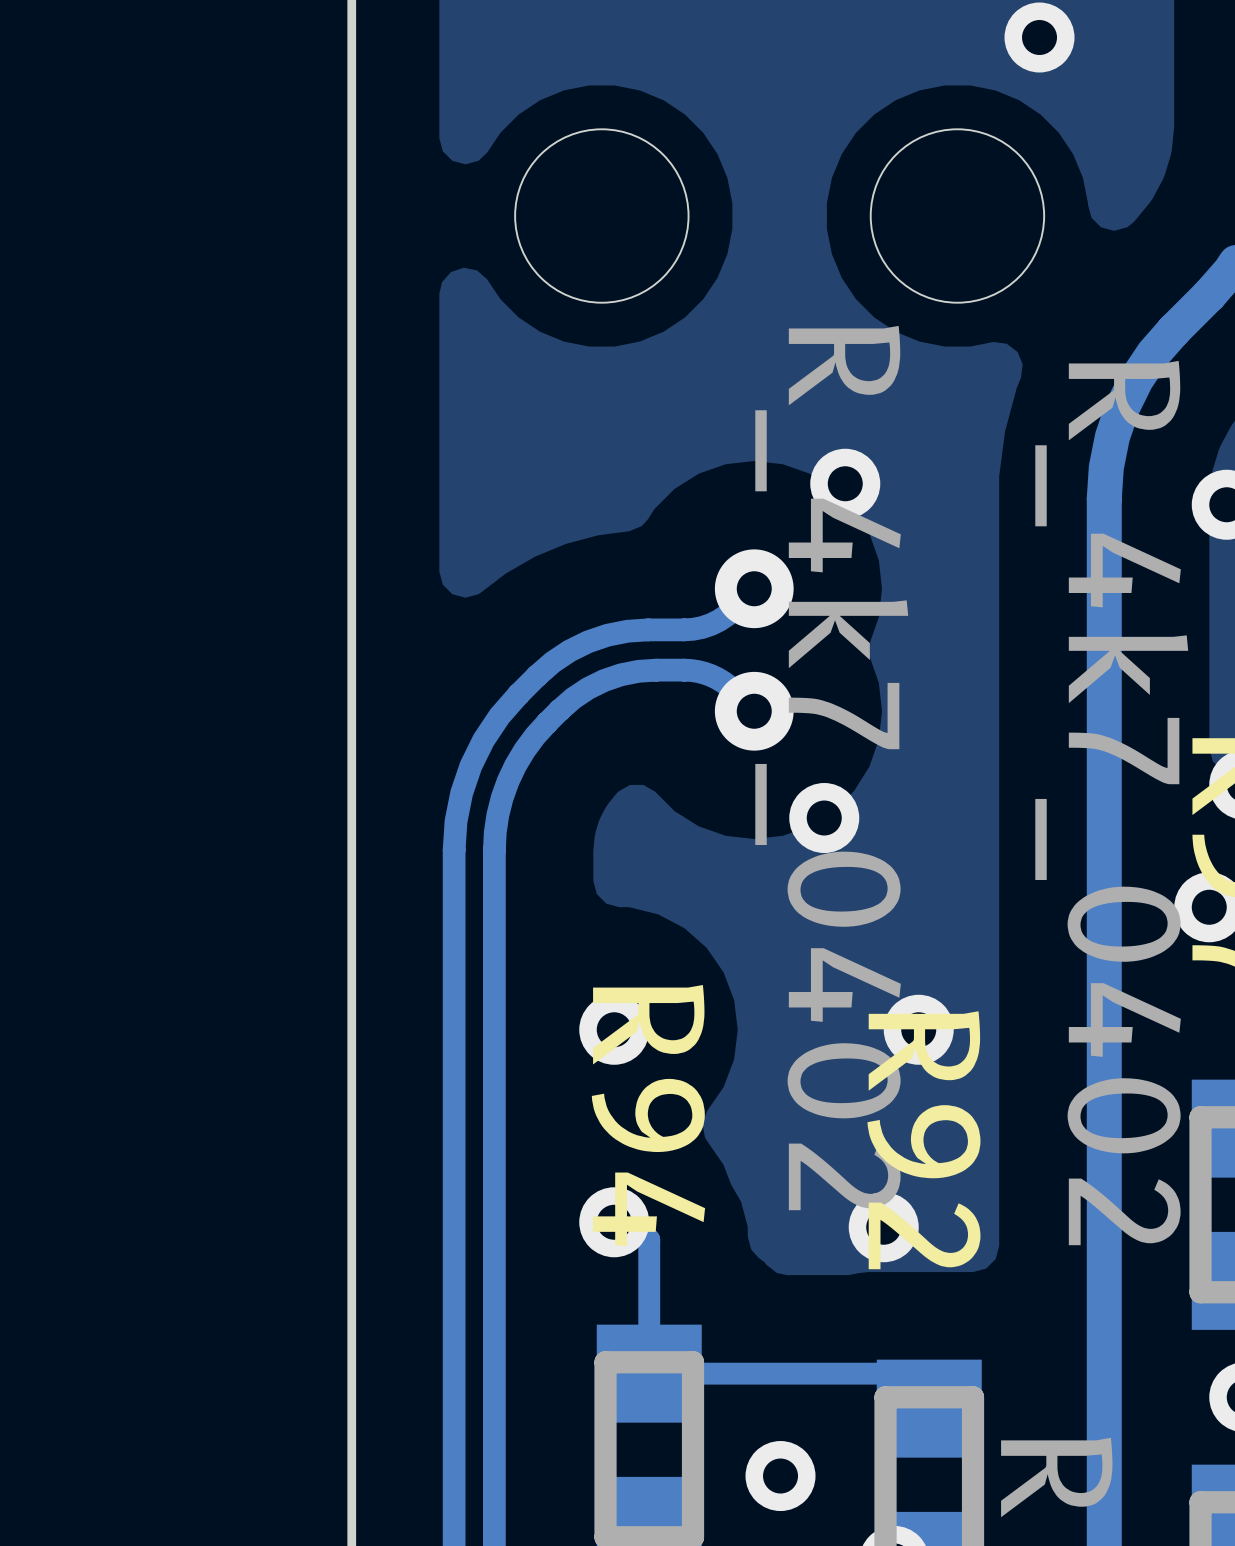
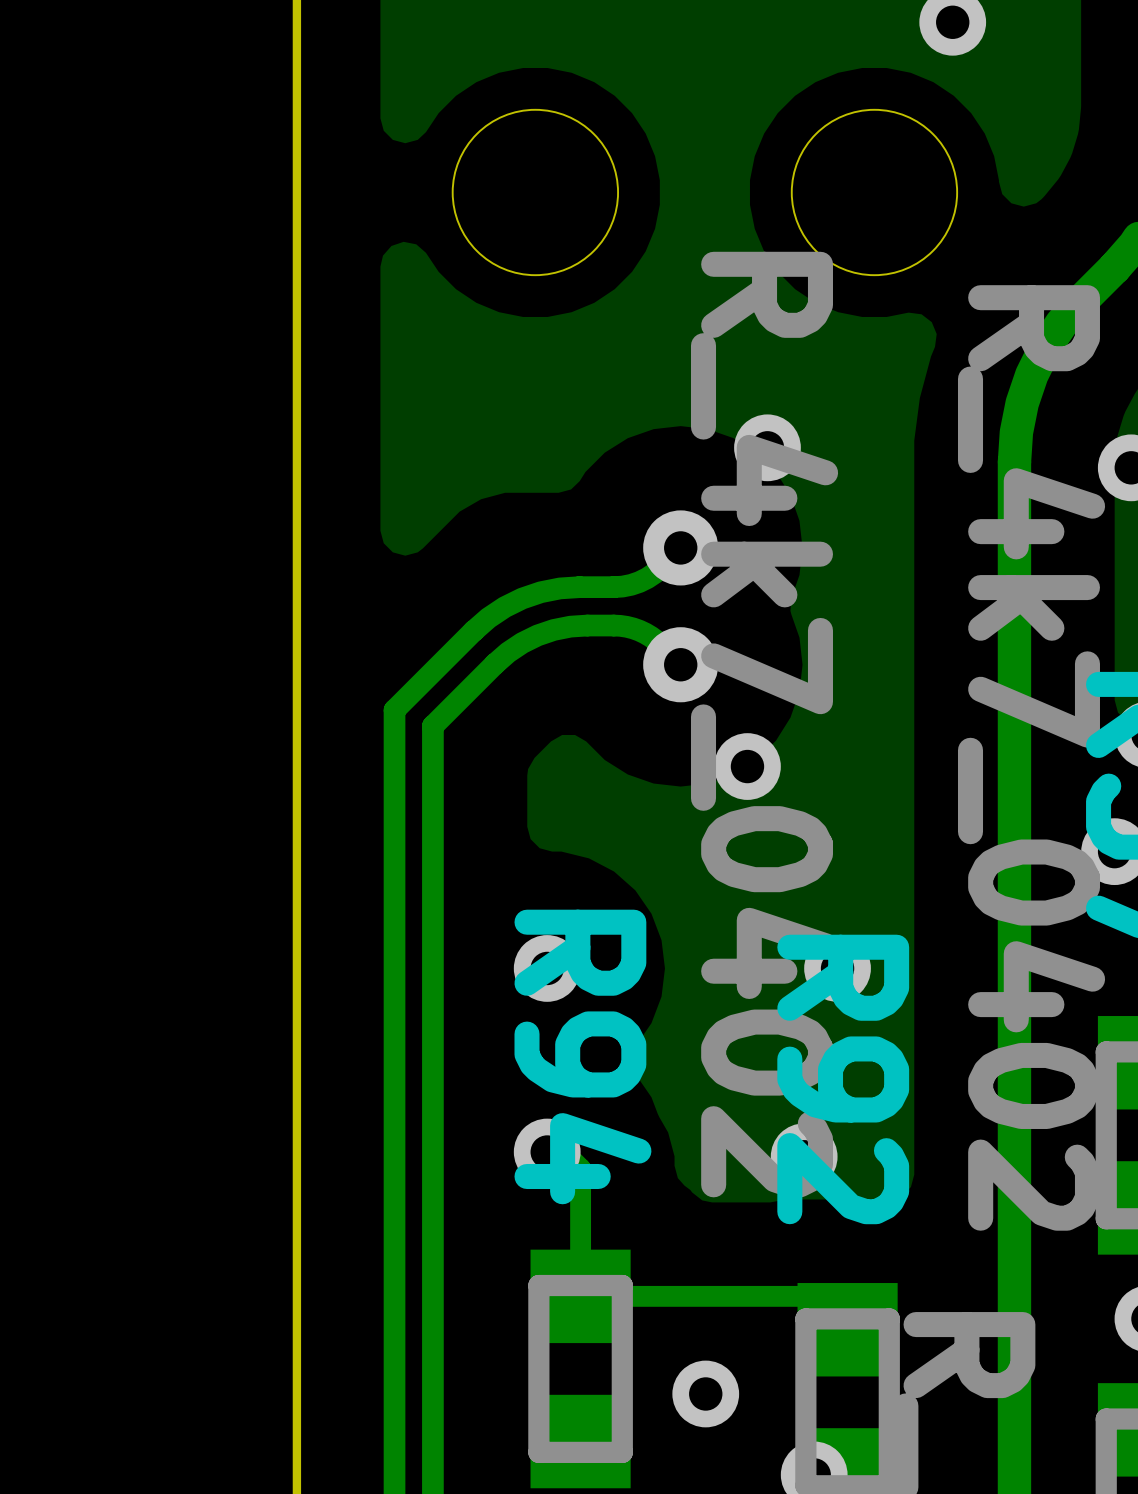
track: (518, 694) (499, 716) (483, 740) (470, 765) (461, 793) (456, 821) (454, 850) -> (456, 648) (394, 710) (394, 797)
track: (547, 722) (524, 750) (508, 781) (497, 815) (494, 850) -> (483, 675) (432, 726) (432, 797)

